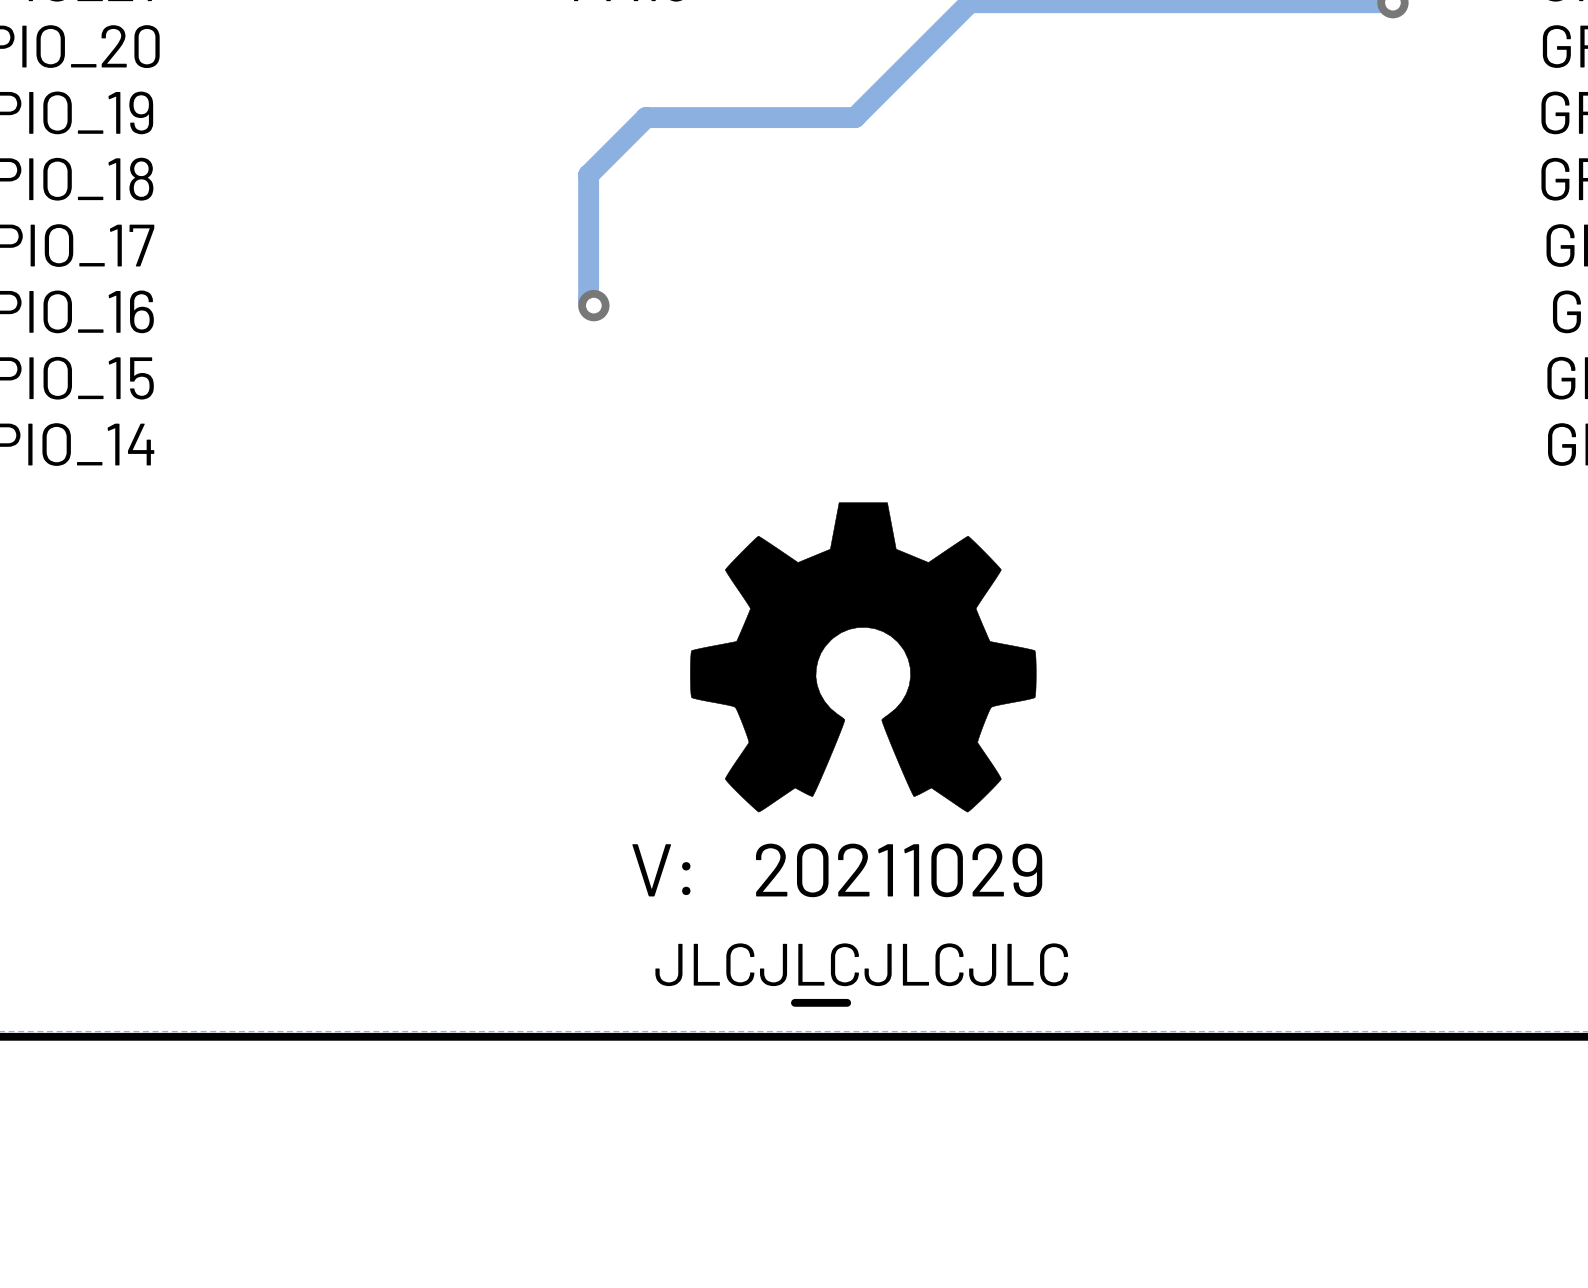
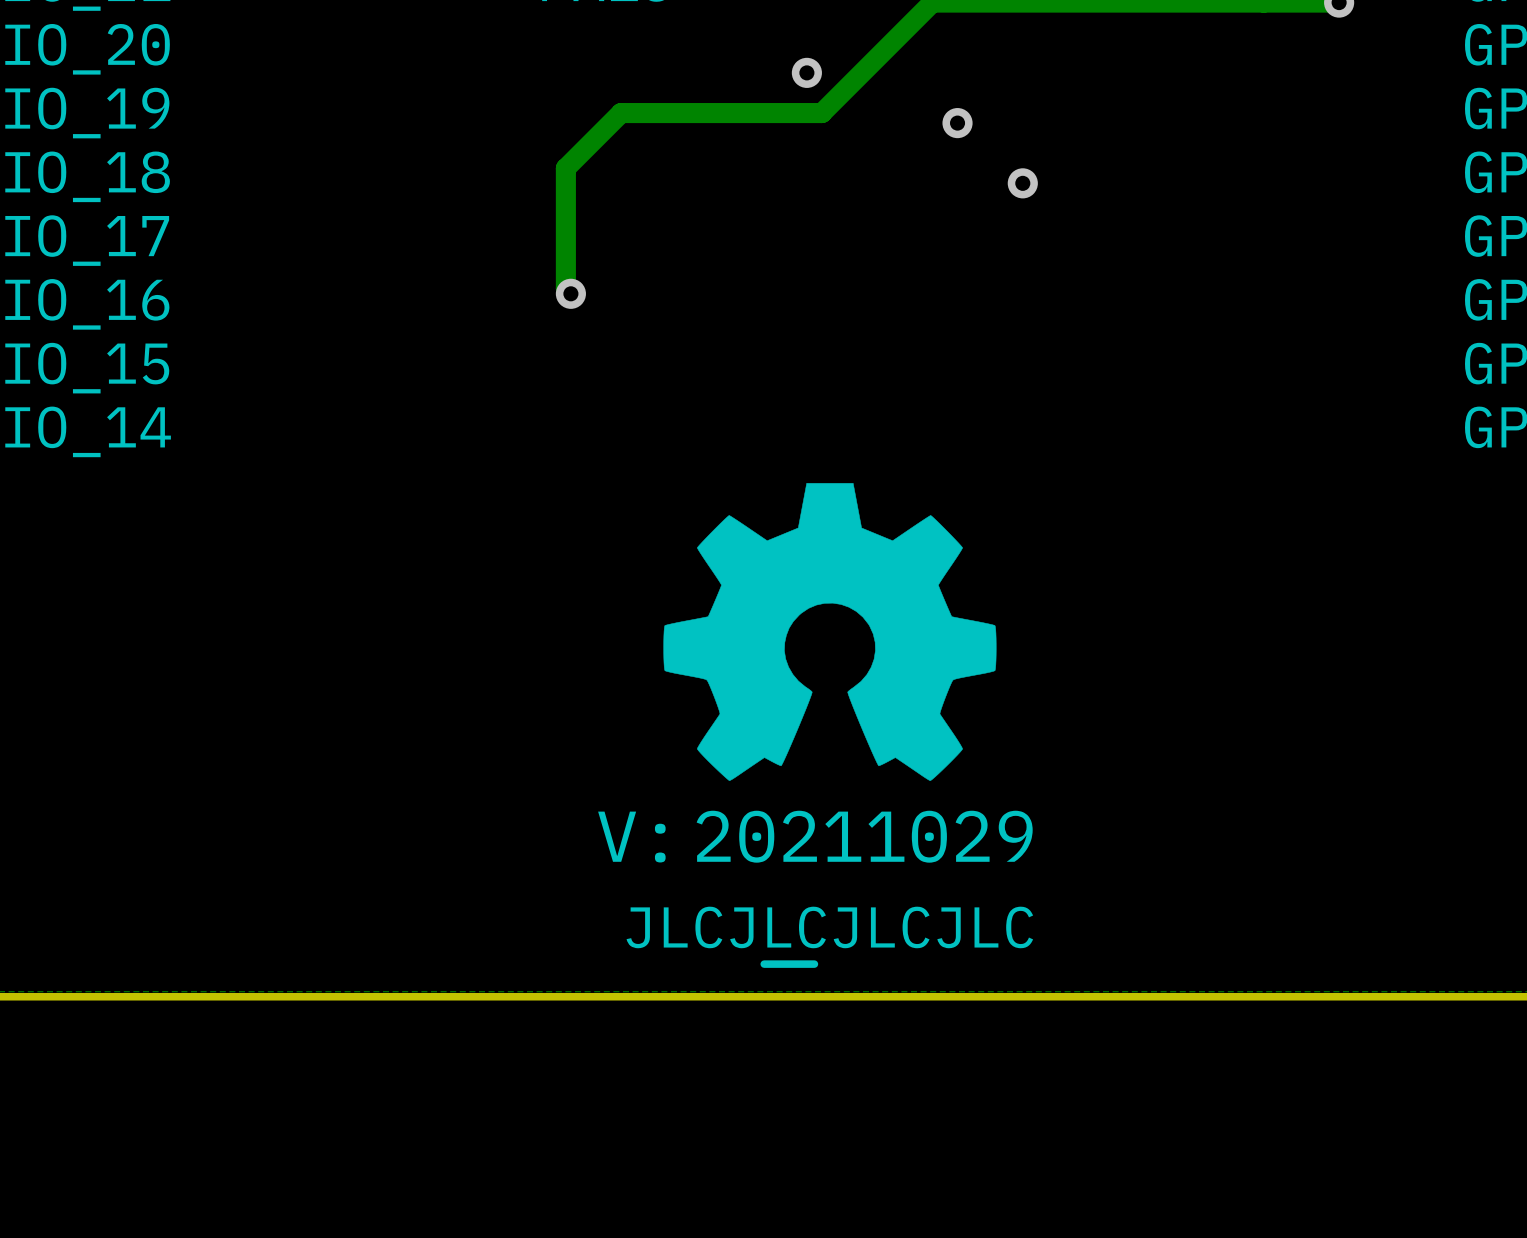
via: none -> (806, 72)
via: none -> (957, 123)
via: none -> (1022, 183)

